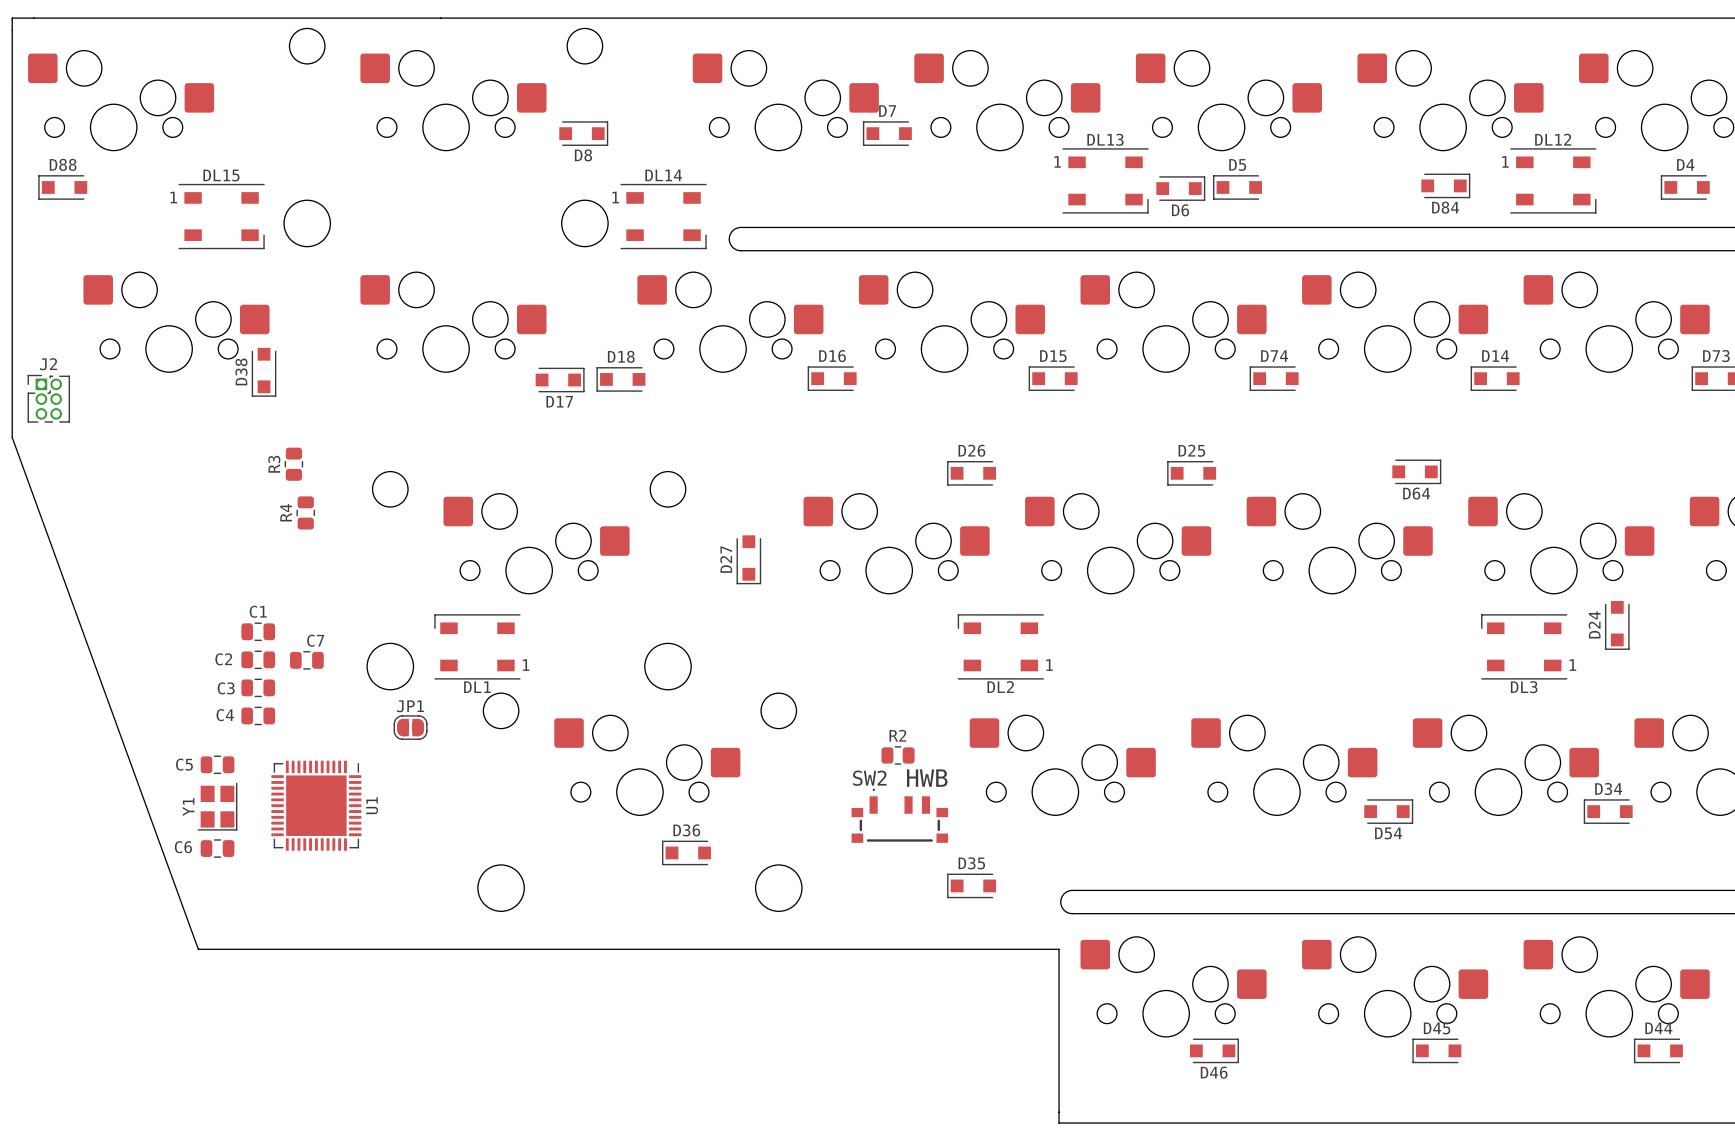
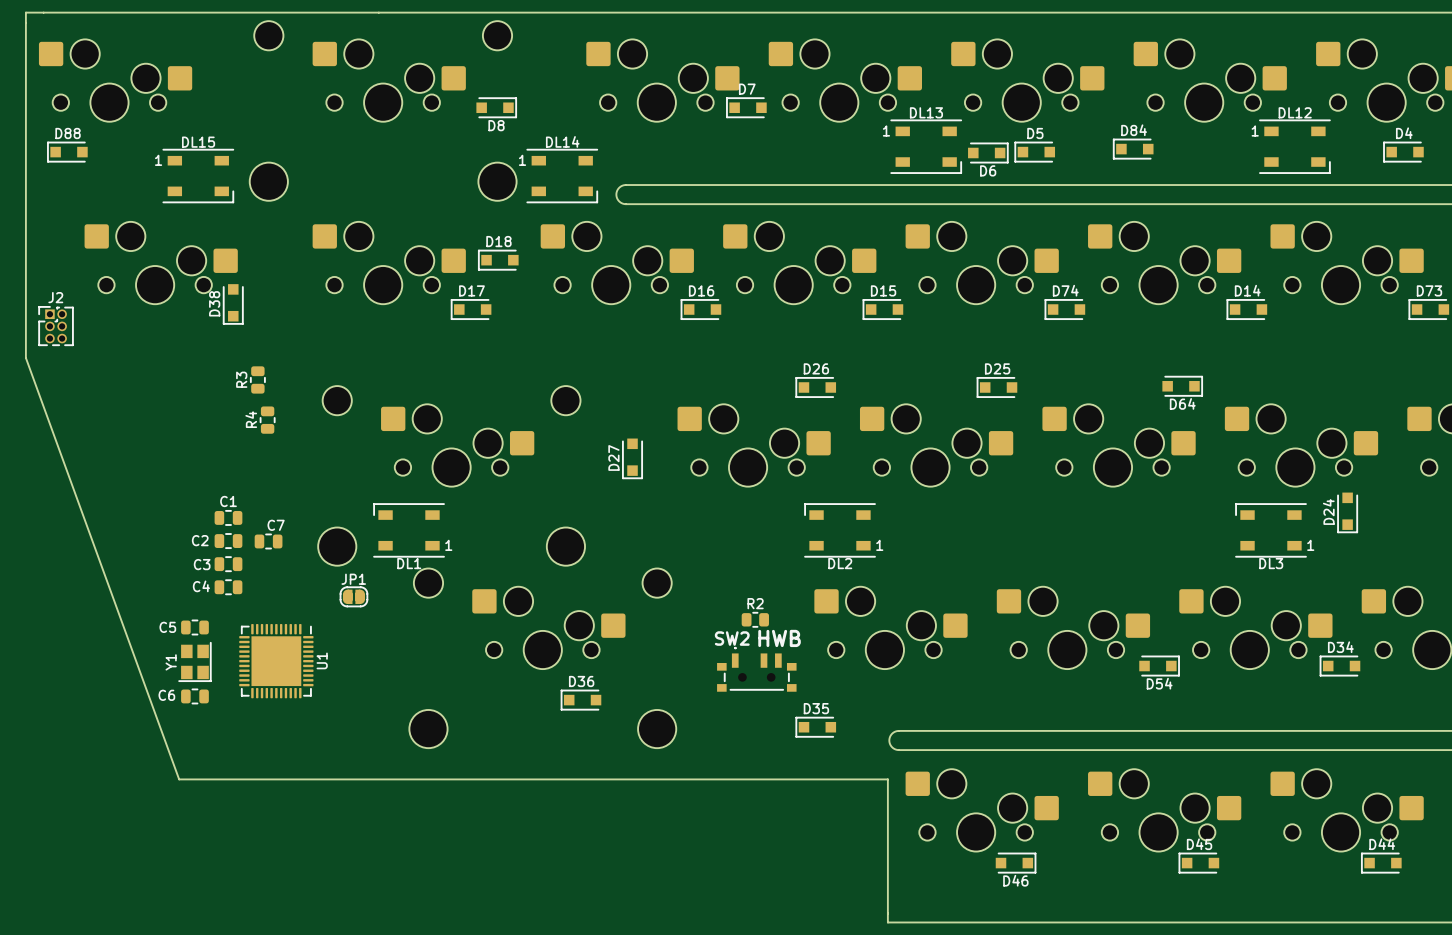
D84 rotation: 0° (1445, 185) -> 180° (1133, 149)
D84 position: (1445, 185) -> (1133, 149)
D18 position: (620, 379) -> (498, 260)
D17 rotation: 0° (560, 380) -> 180° (471, 309)

